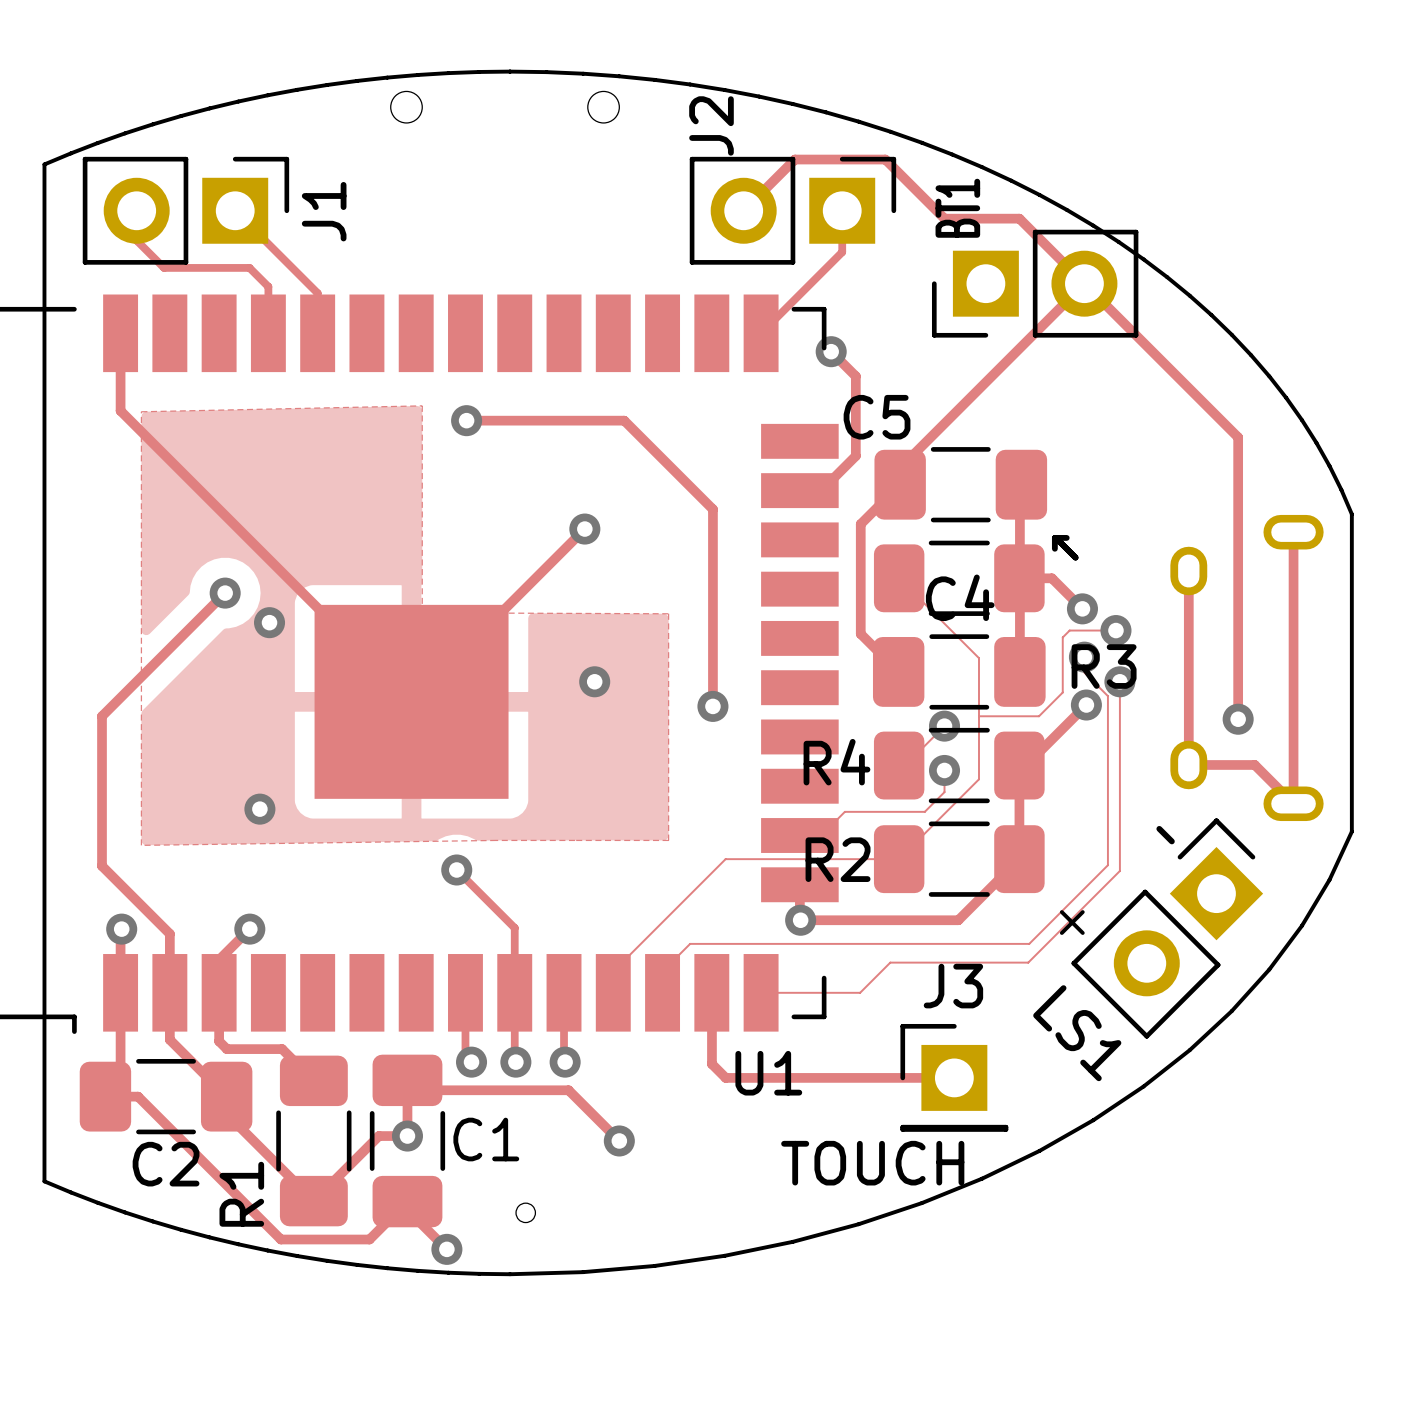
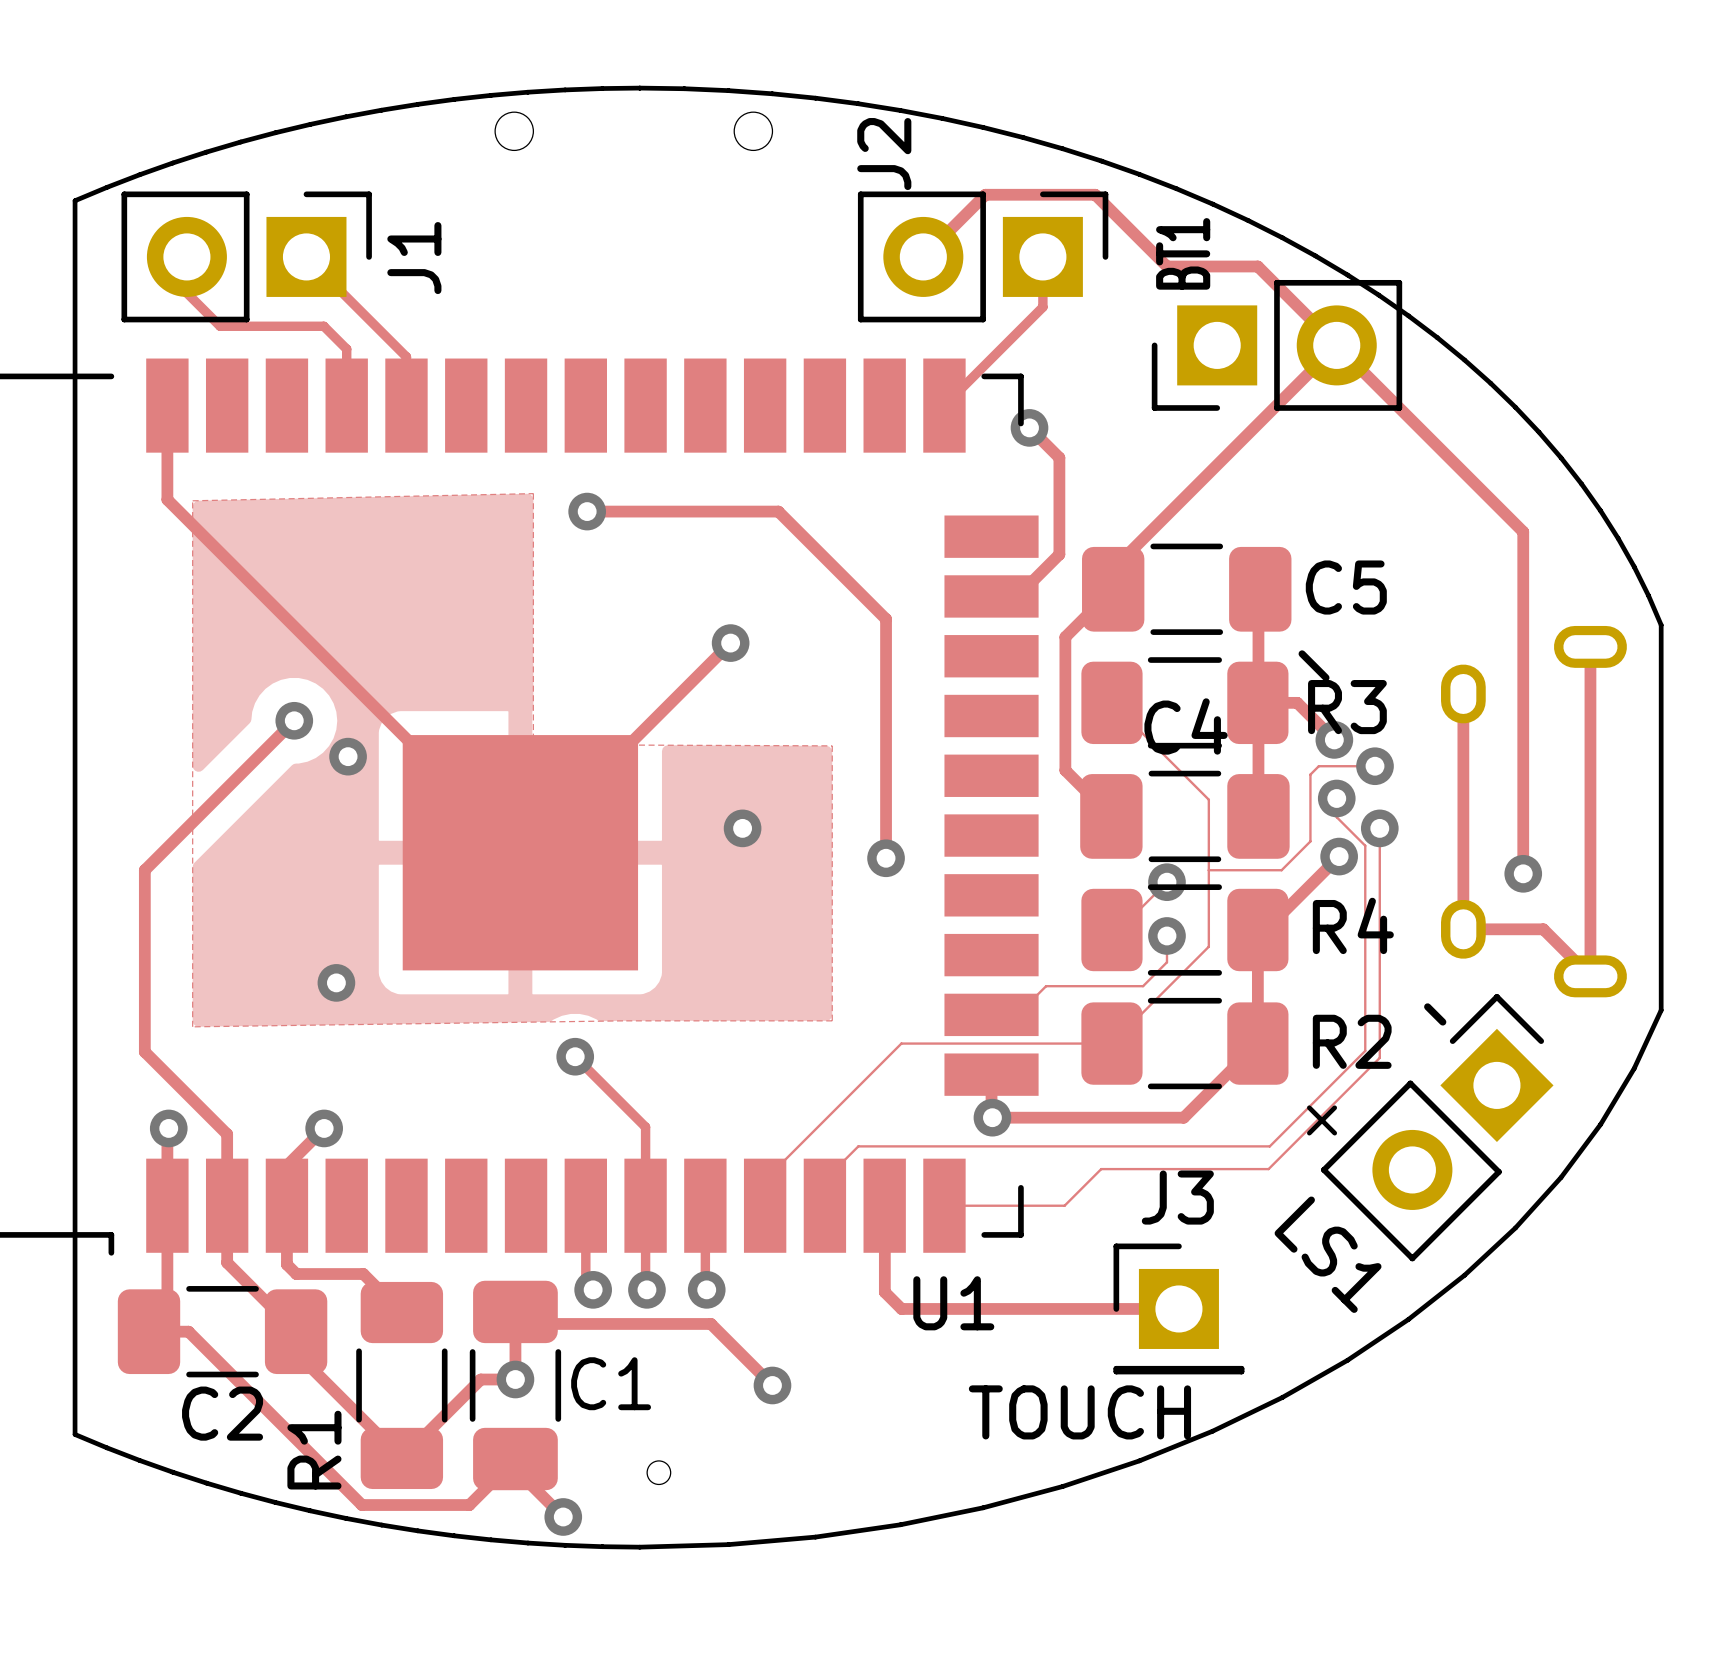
C5 name position: C5 (877, 417) -> C5 (1346, 587)
line: (1066, 537) (1054, 537) (1054, 548) -> none
R3 name position: R3 (1104, 666) -> R3 (1347, 707)
R4 name position: R4 (836, 762) -> R4 (1353, 925)
R2 name position: R2 (838, 859) -> R2 (1352, 1041)

